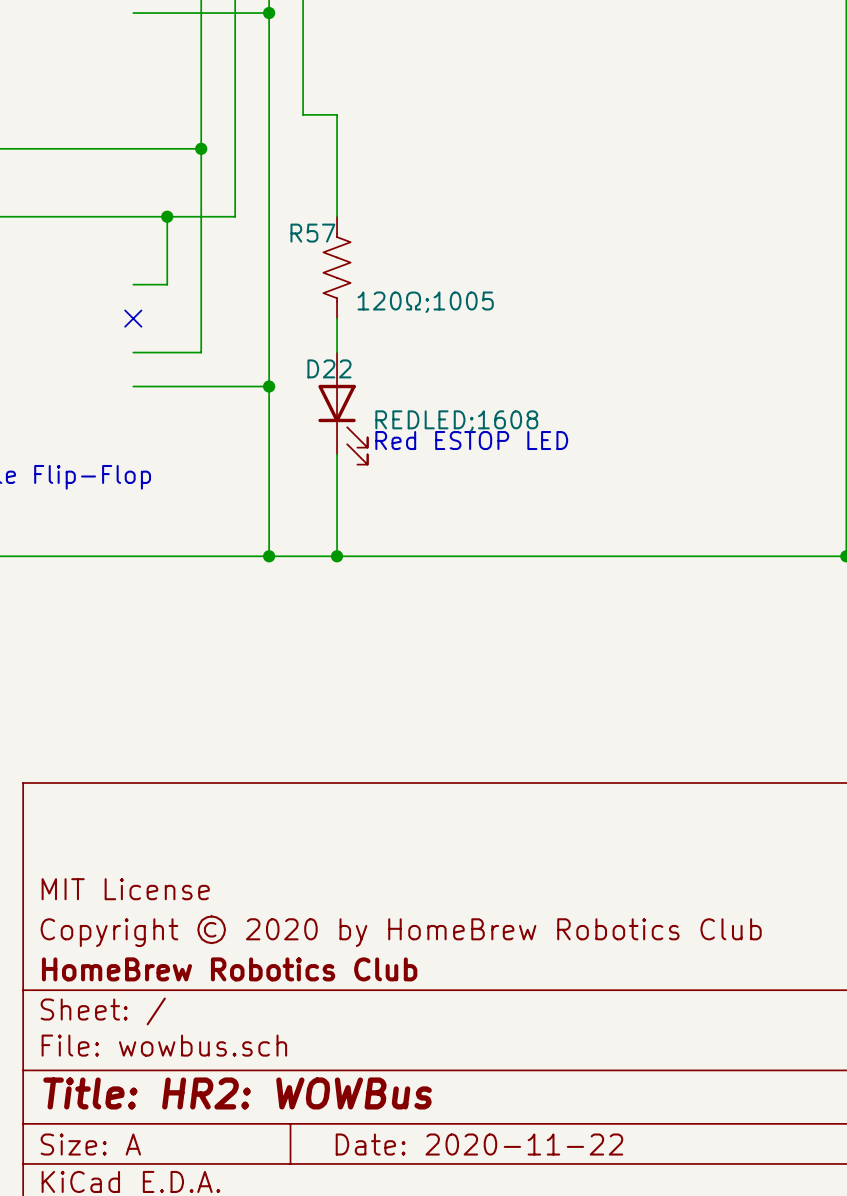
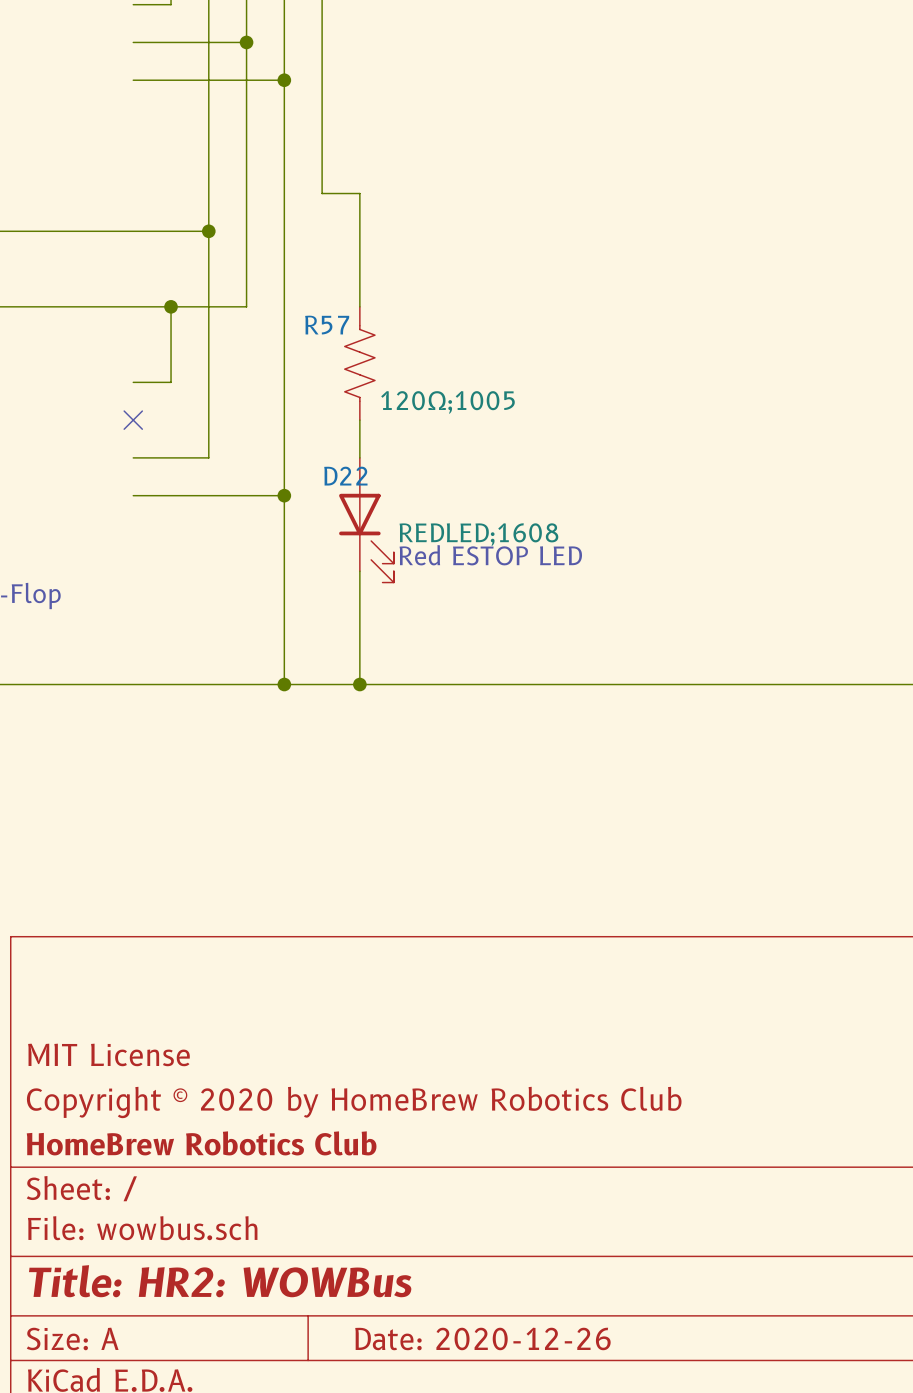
title block: Date: 2020-11-22 (479, 1144) -> Date: 2020-12-26 (482, 1338)

